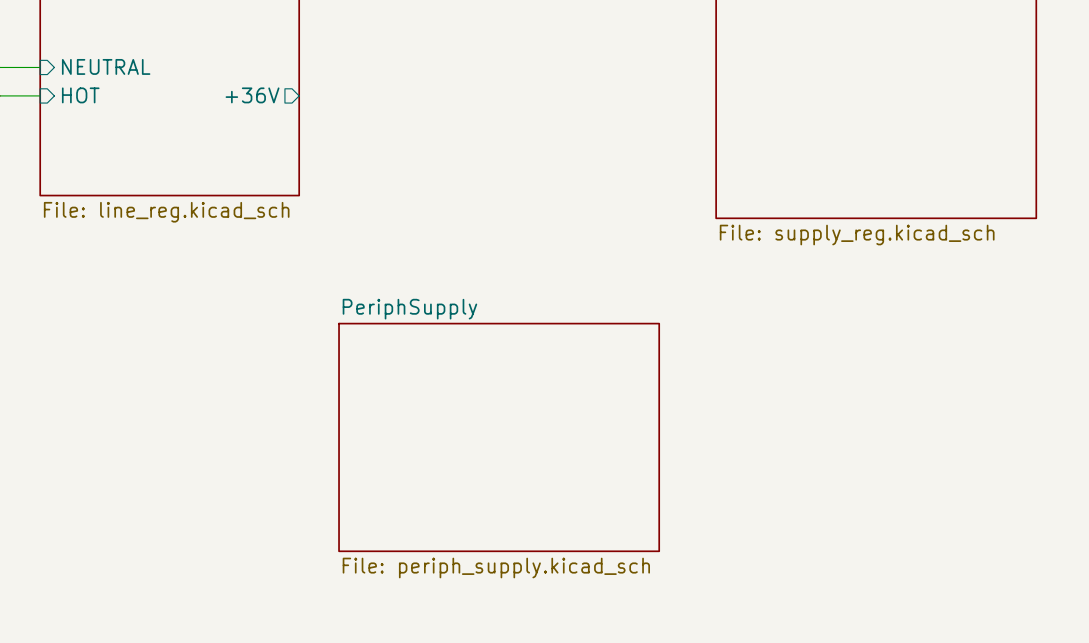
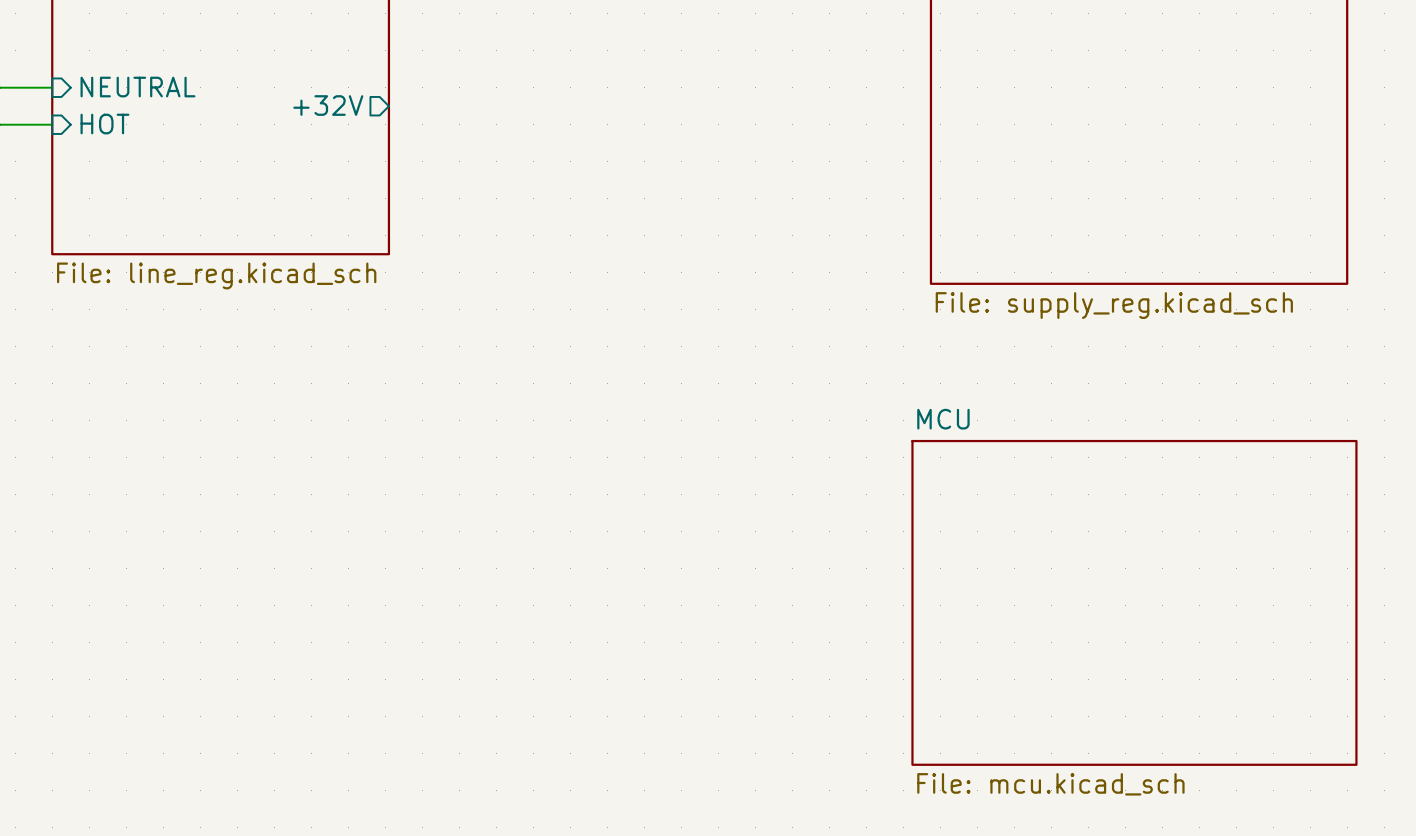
sheet pin: +36V (252, 95) -> +32V (328, 105)
sheet PeriphSupply: File: periph_supply.kicad_sch (499, 437) -> none
sheet MCU: none -> File: mcu.kicad_sch (1134, 602)

